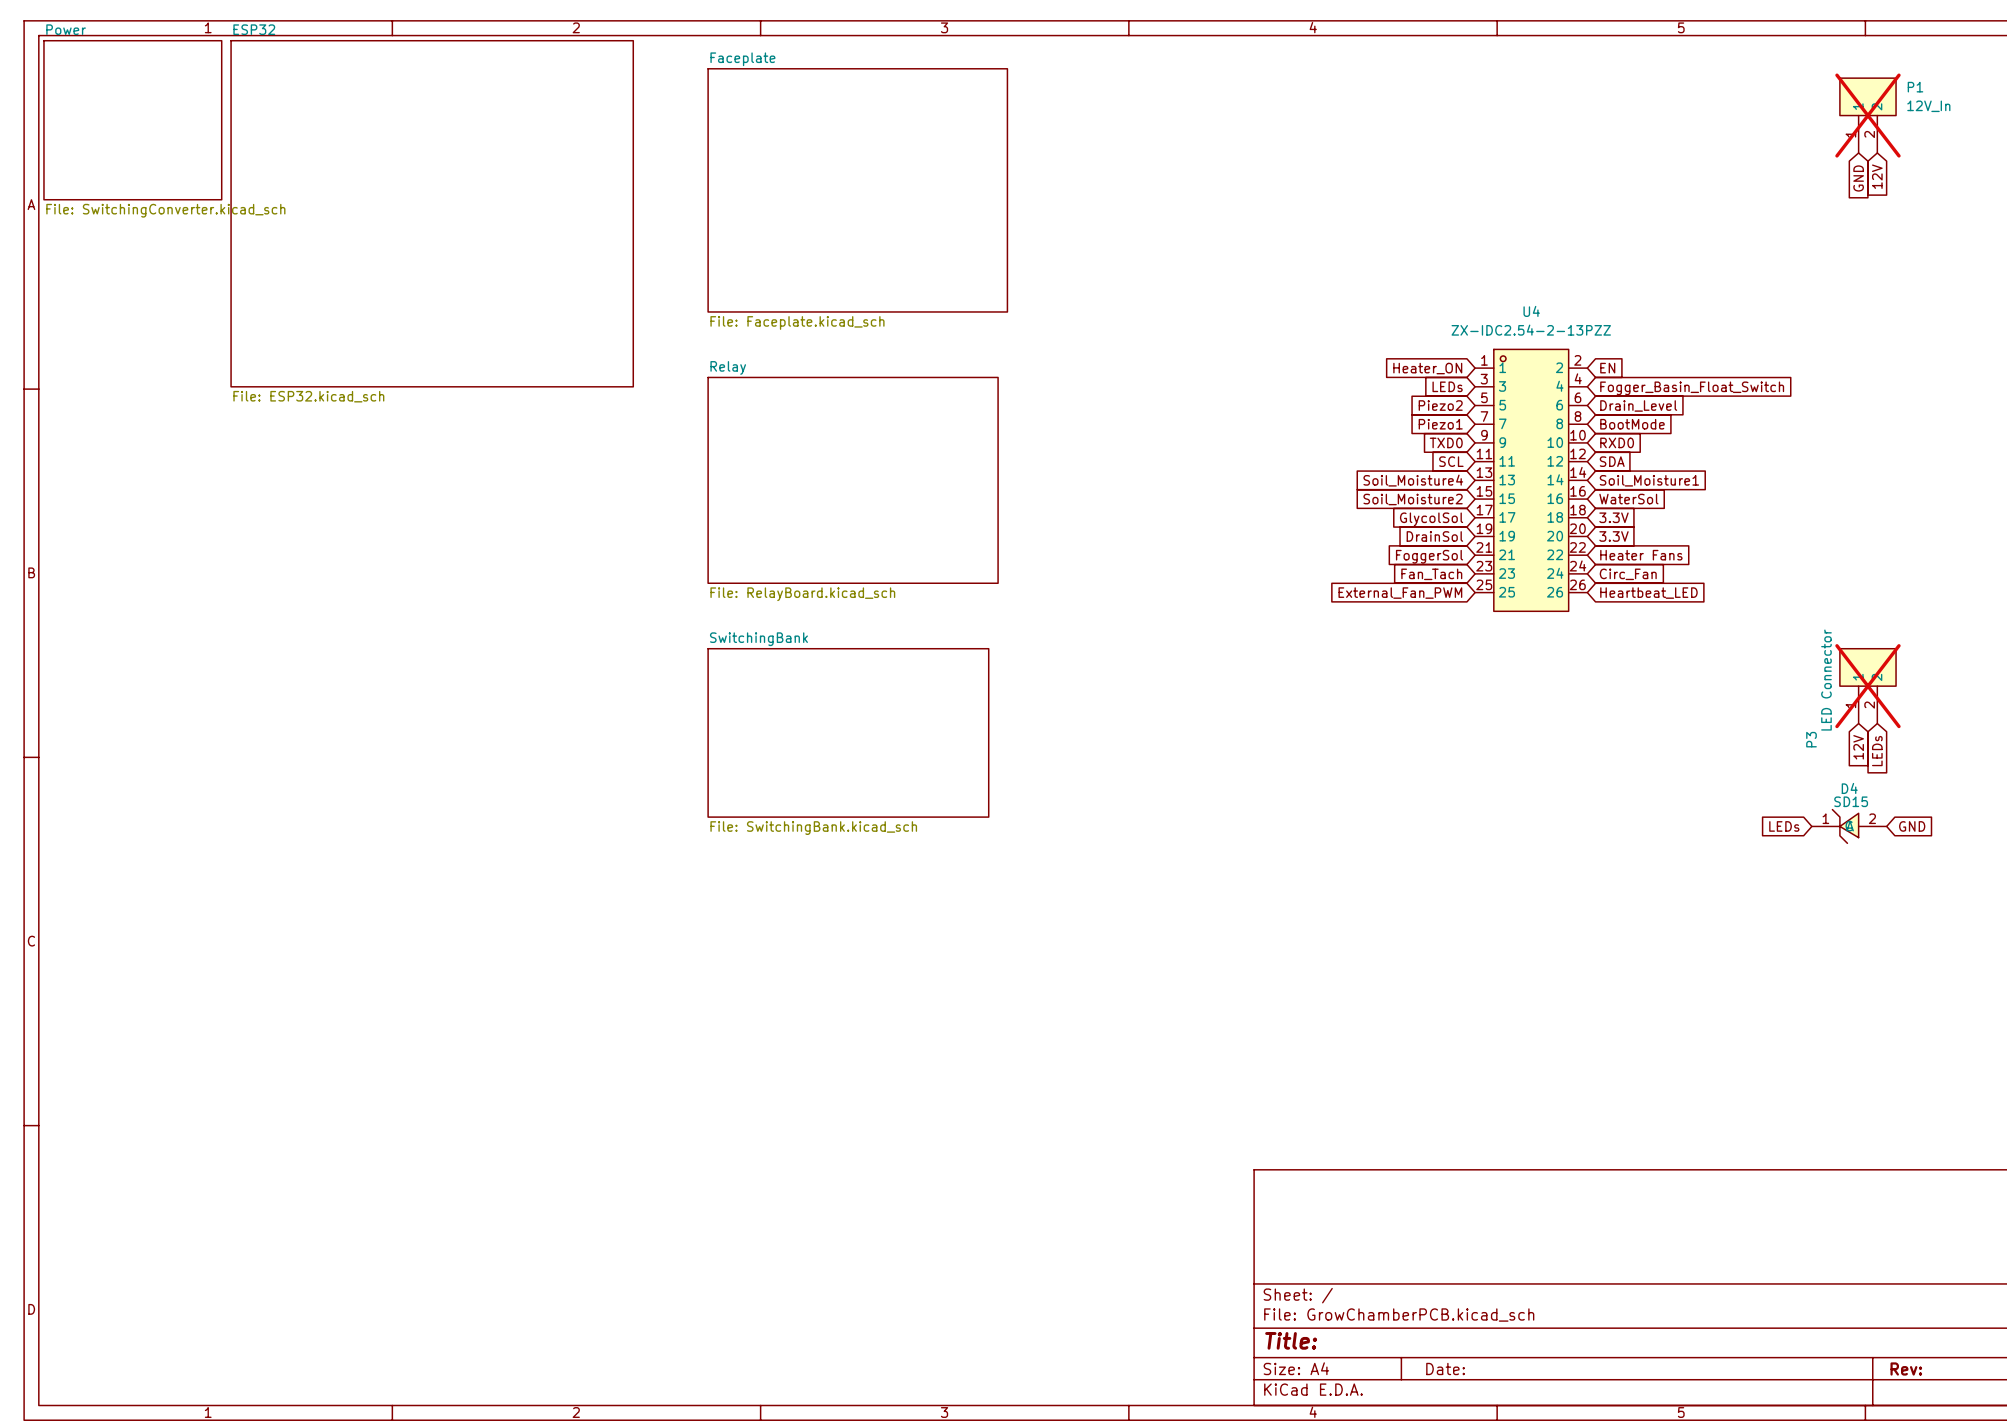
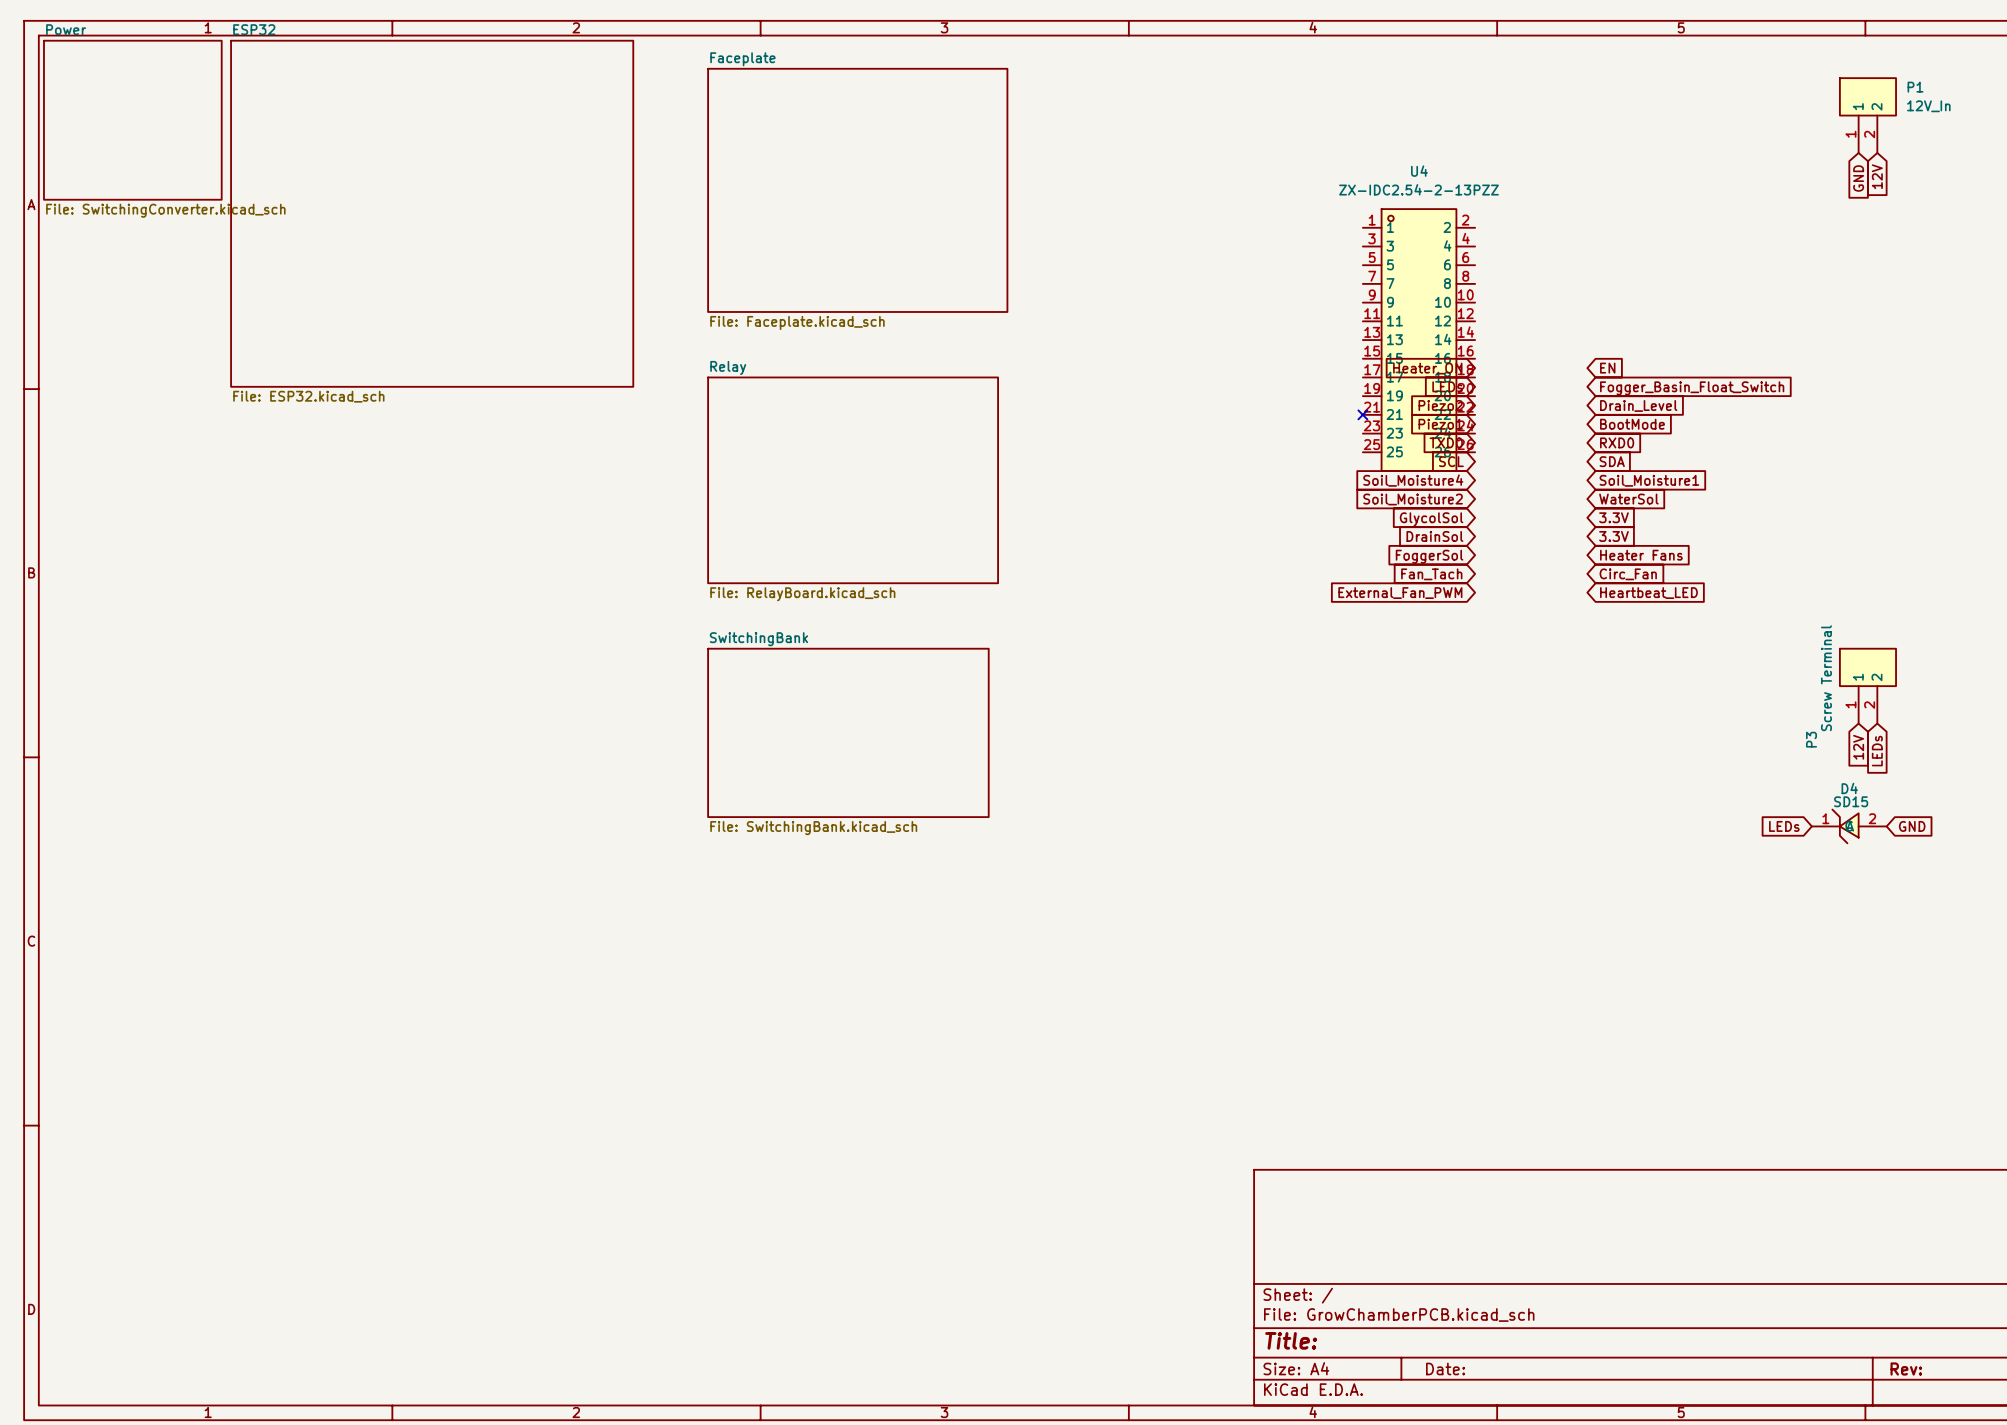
P1 do-not-place cross: (1867, 115) -> none
no-connect mark: none -> (1362, 414)
U4 position: (1531, 480) -> (1418, 340)
P3 value: LED Connector (1826, 680) -> Screw Terminal (1826, 678)
P3 do-not-place cross: (1867, 686) -> none

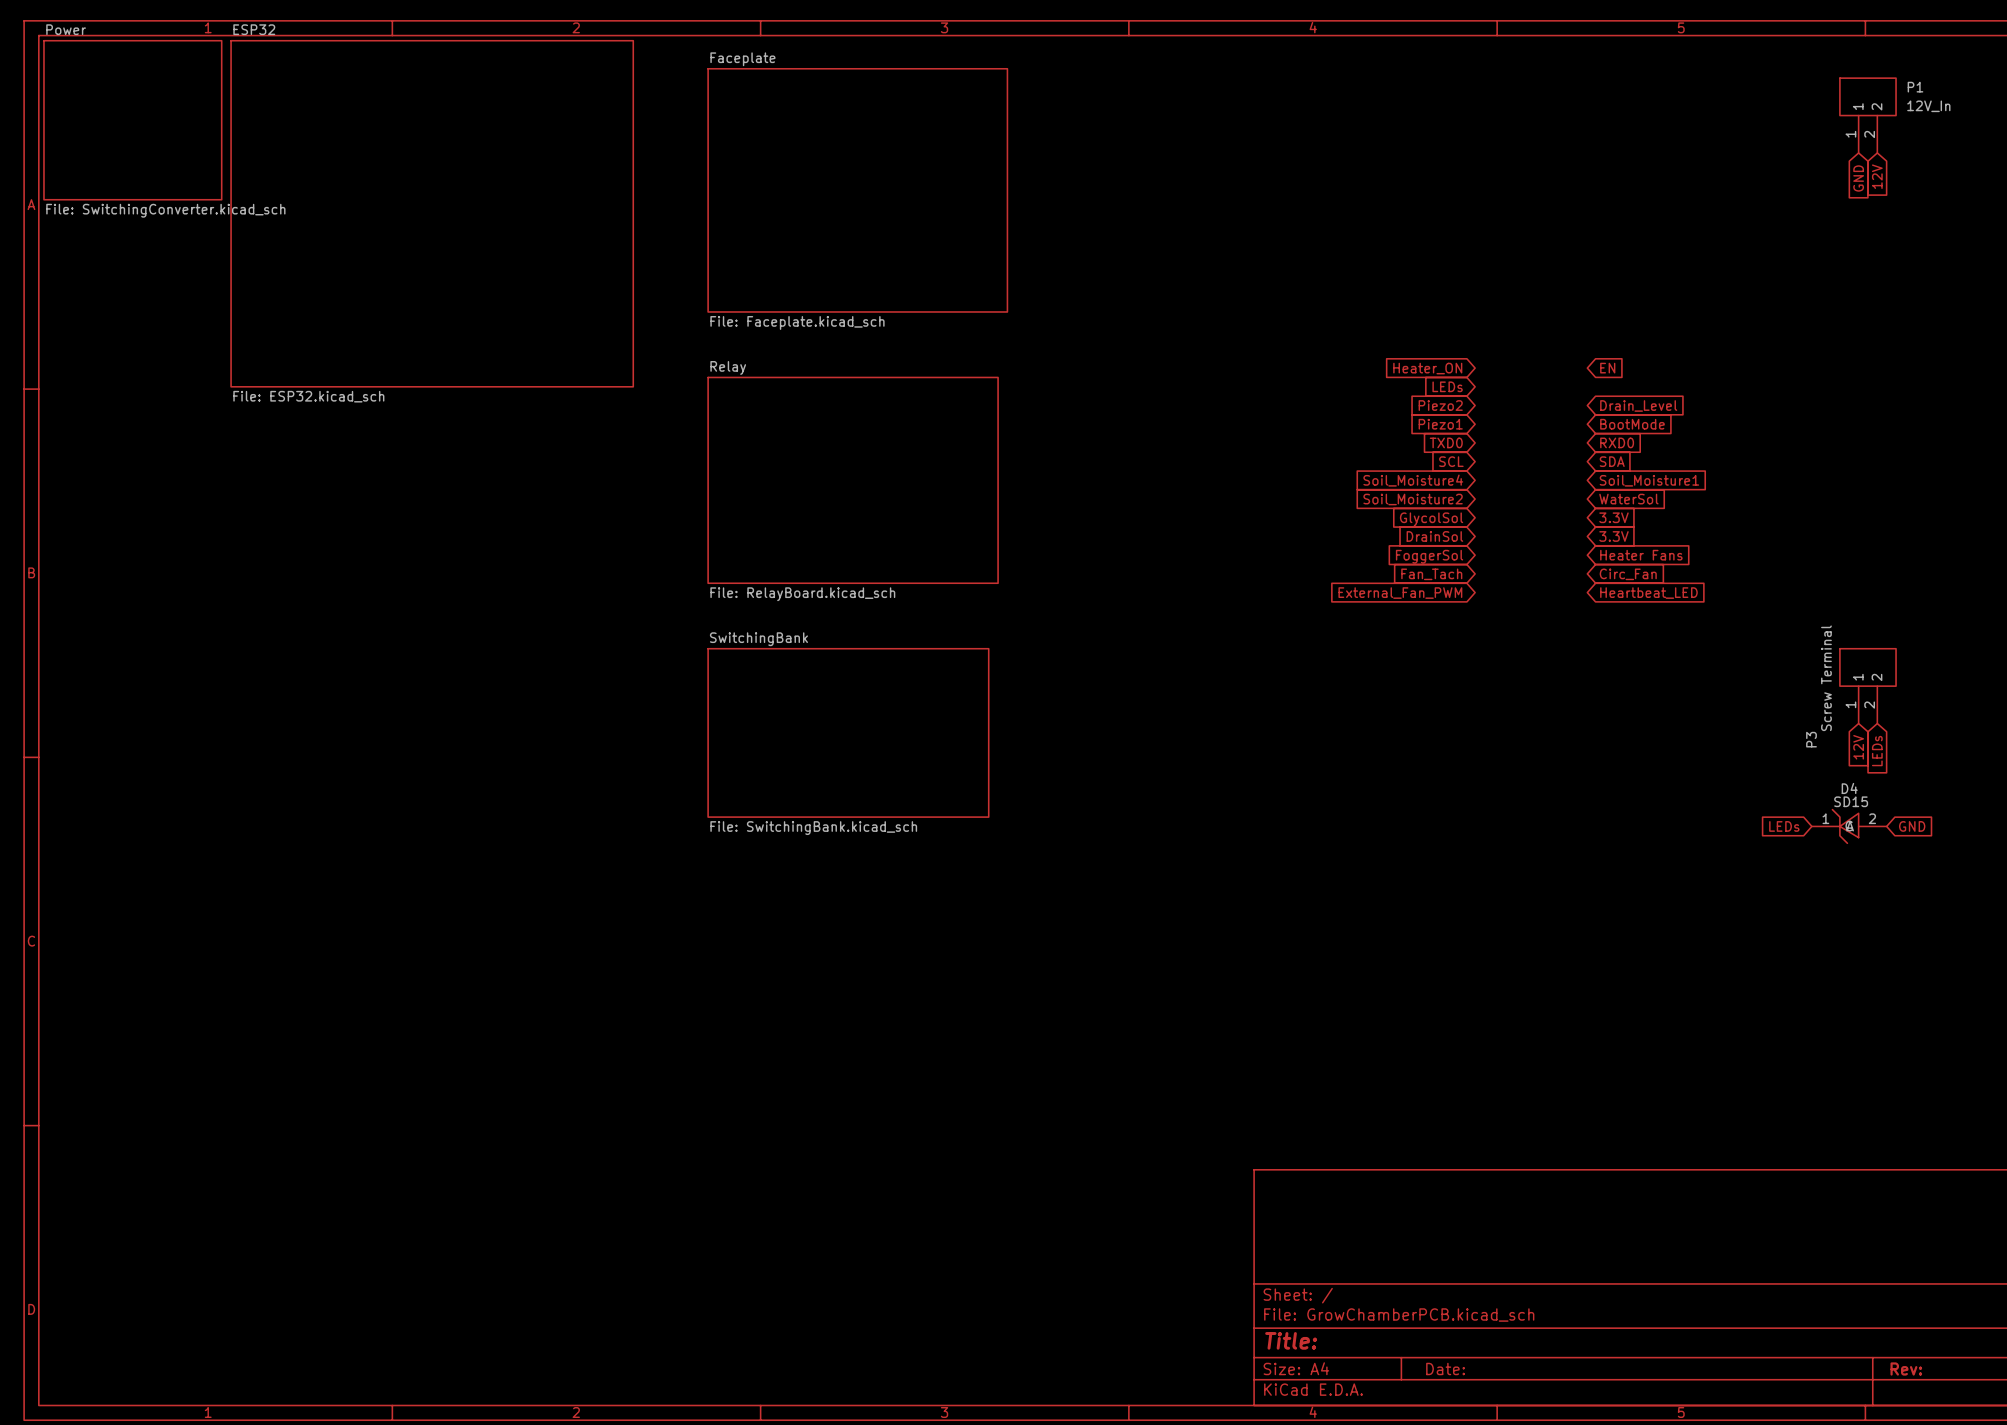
U4: ZX-IDC2.54-2-13PZZ (1418, 340) -> none
global label: Fogger_Basin_Float_Switch (1692, 388) -> none
no-connect mark: (1362, 414) -> none

